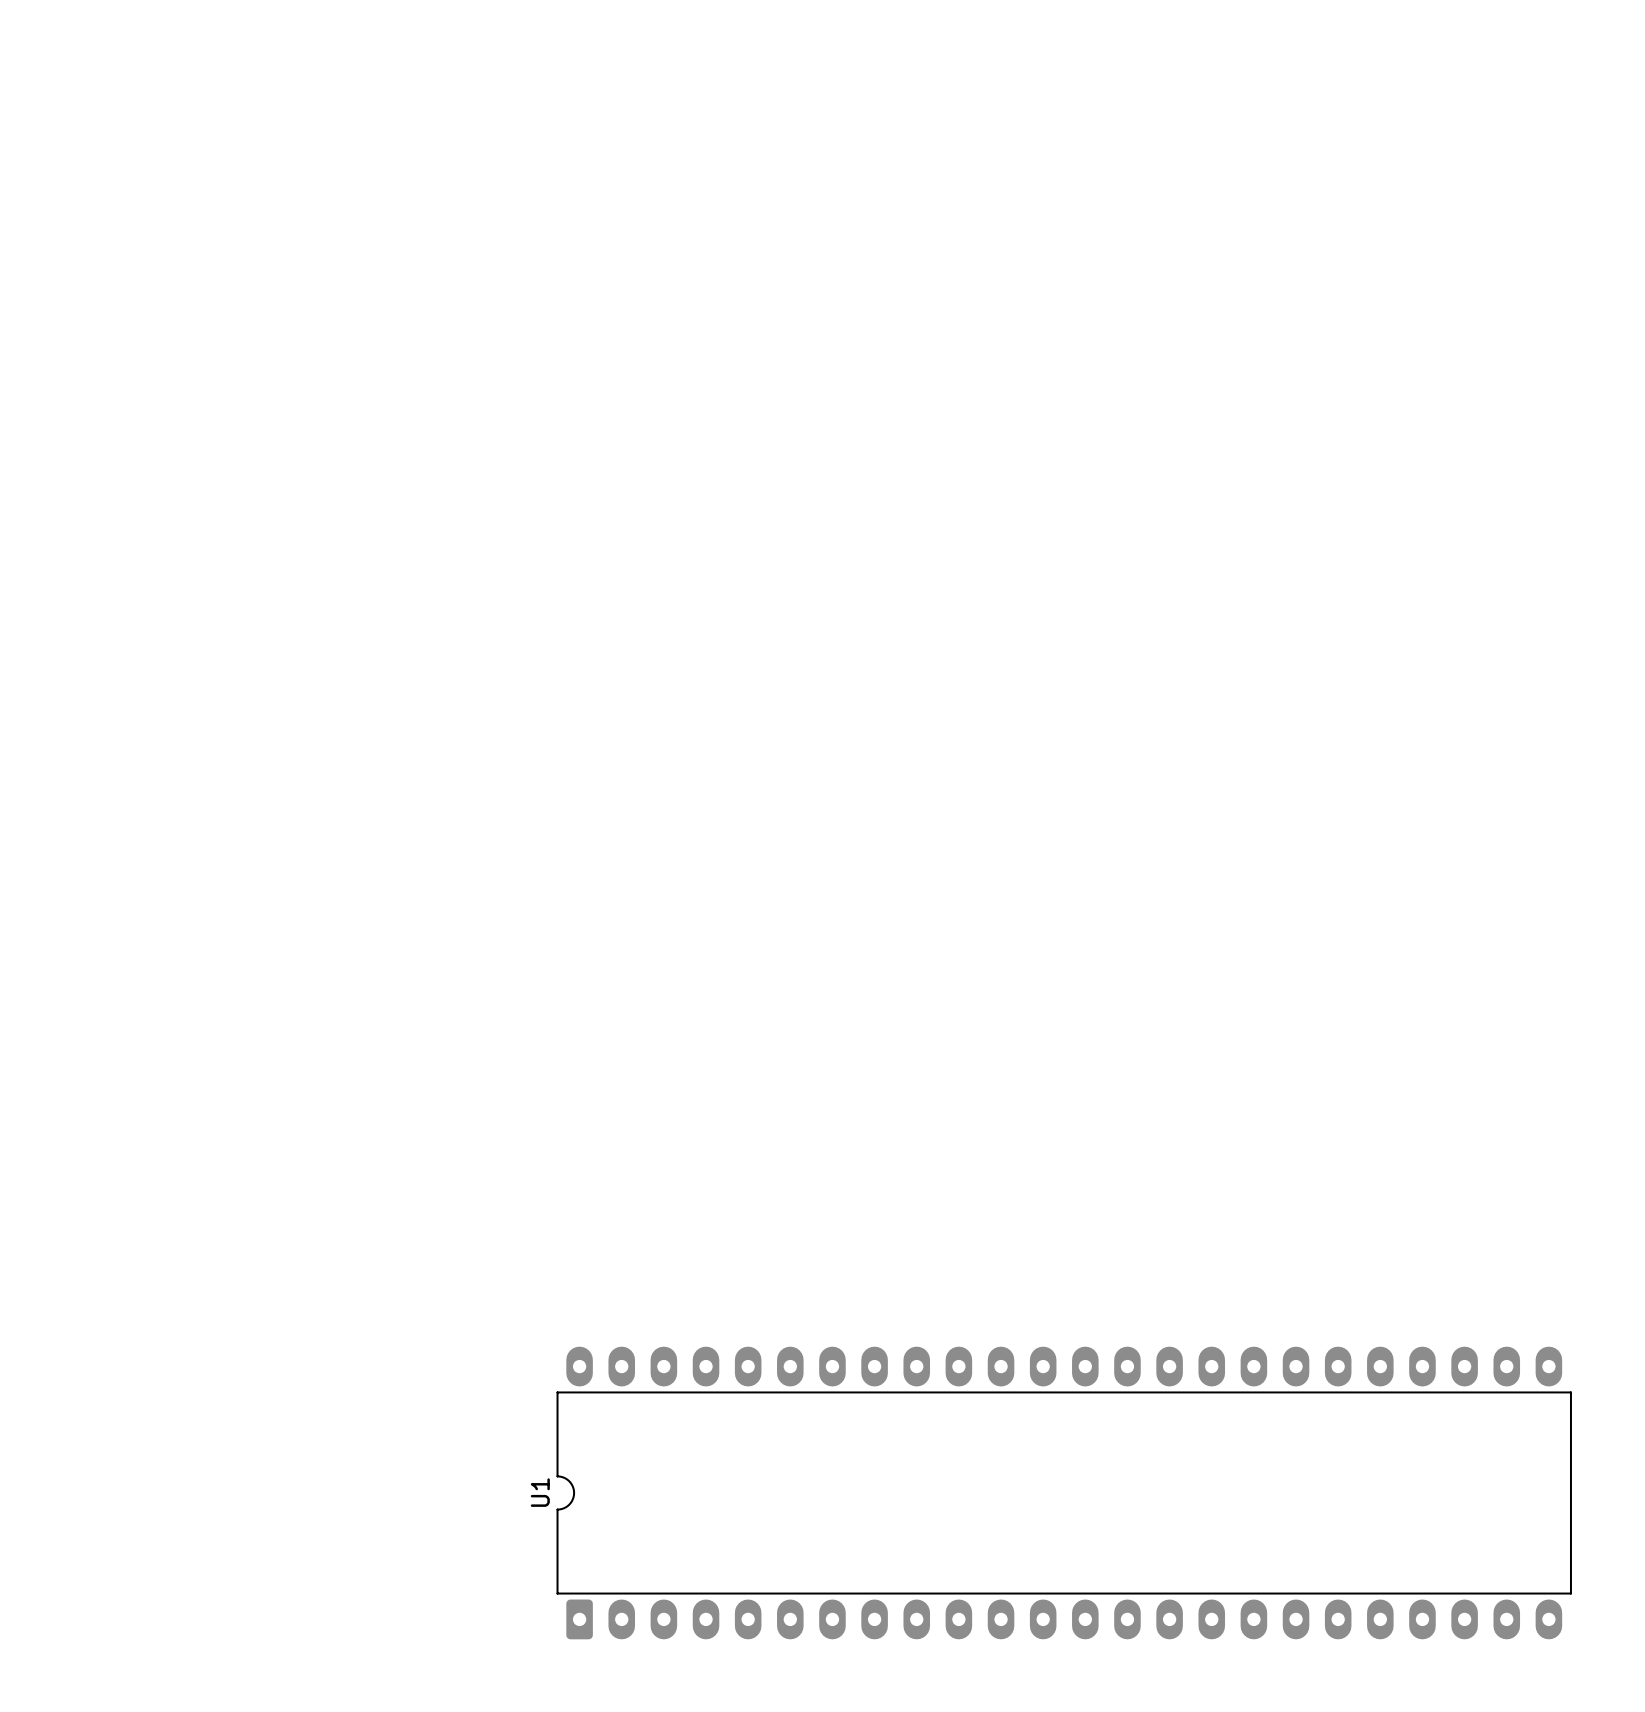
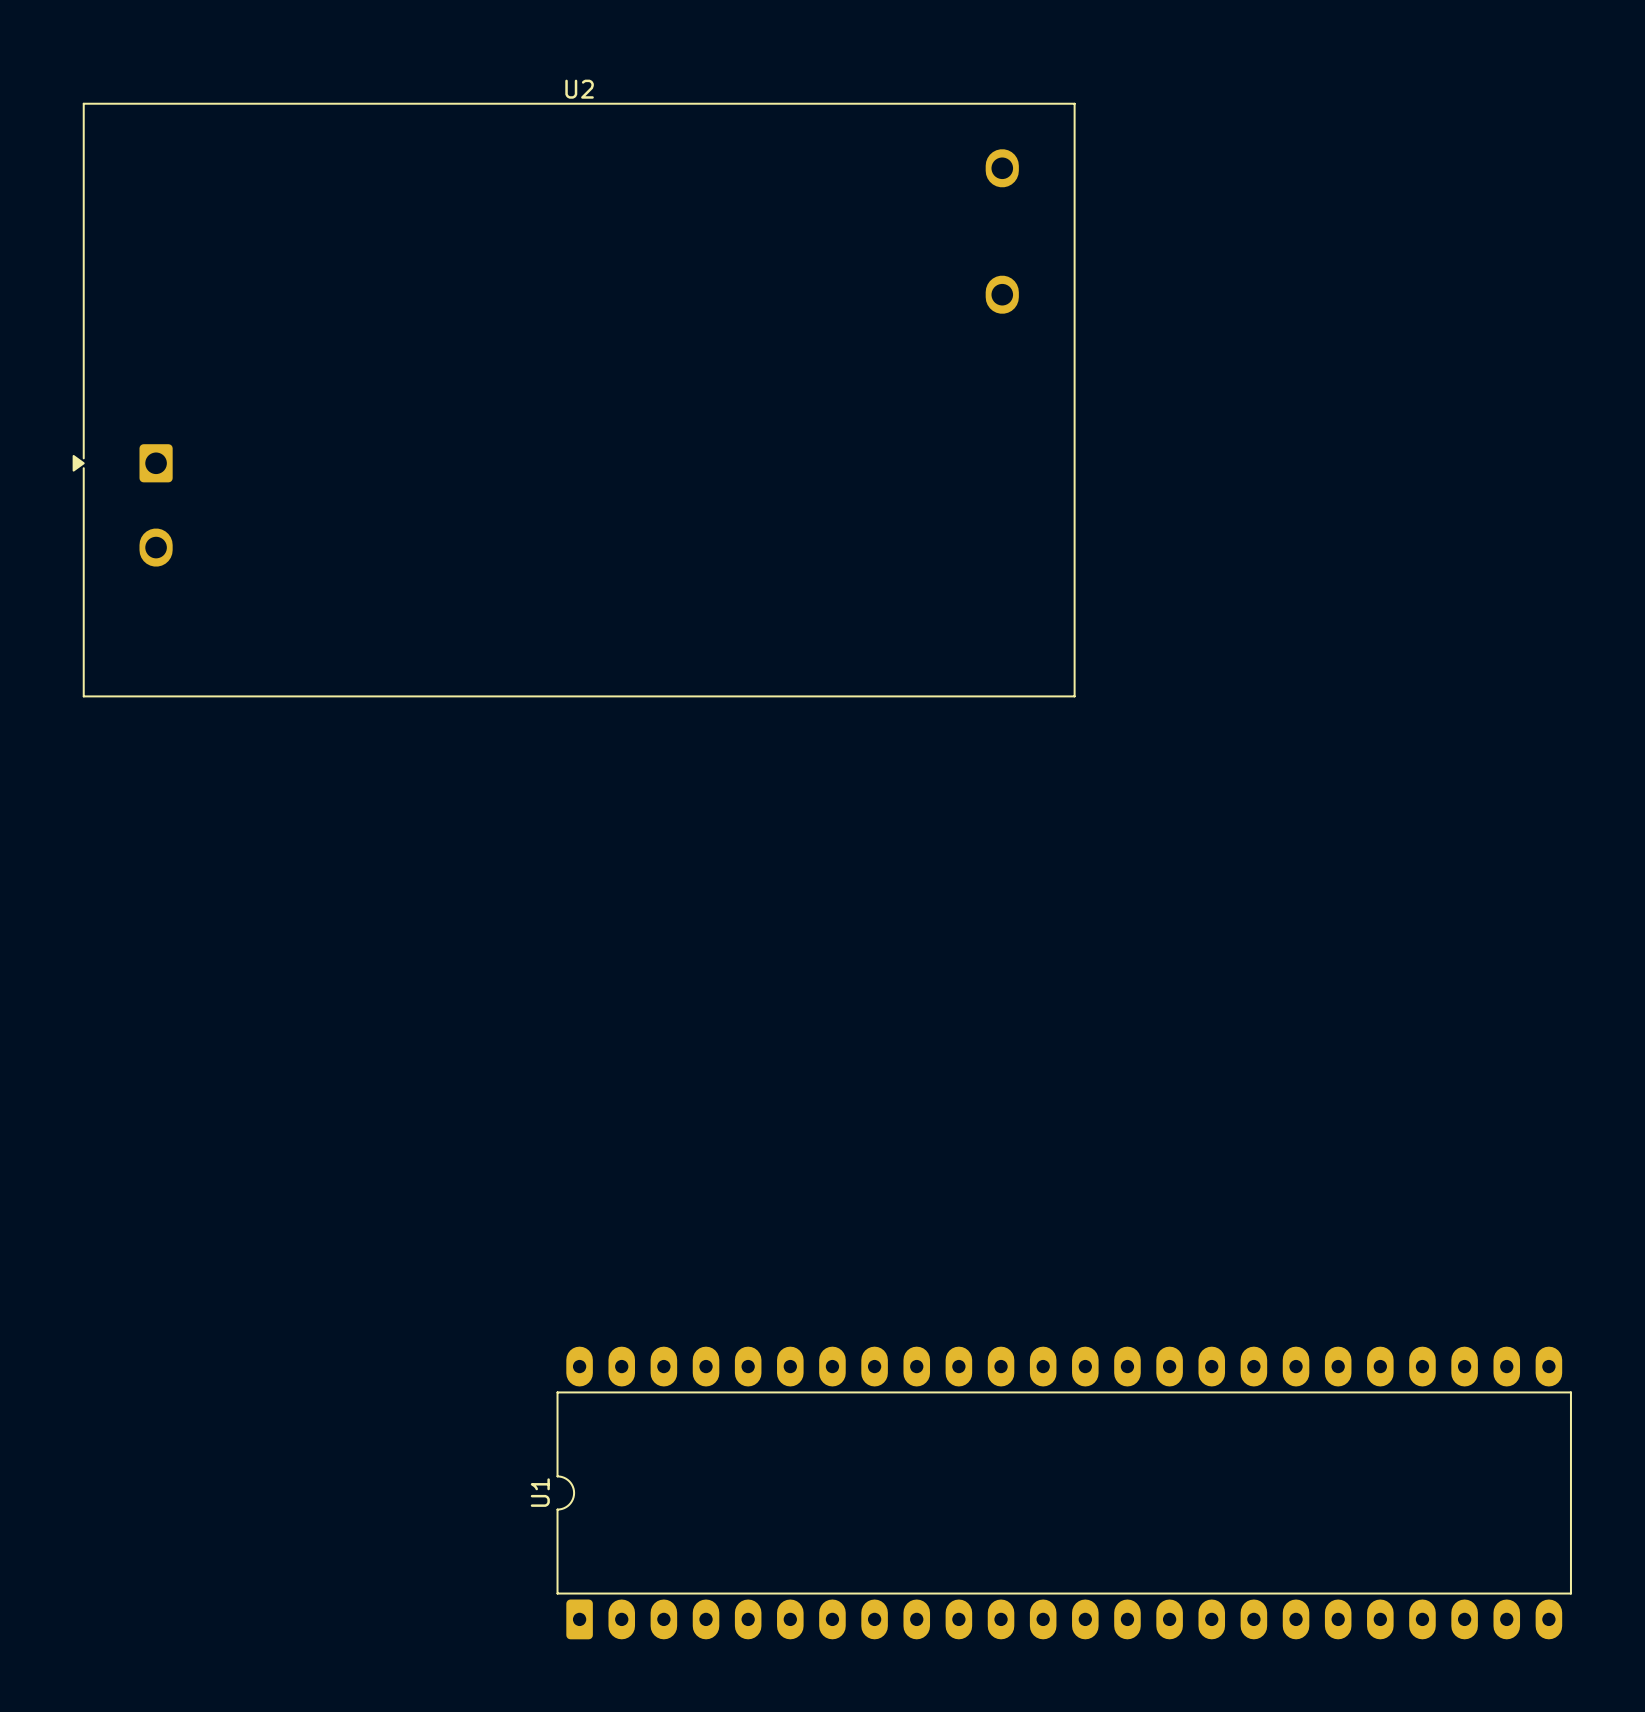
U2: none -> (574, 400)

